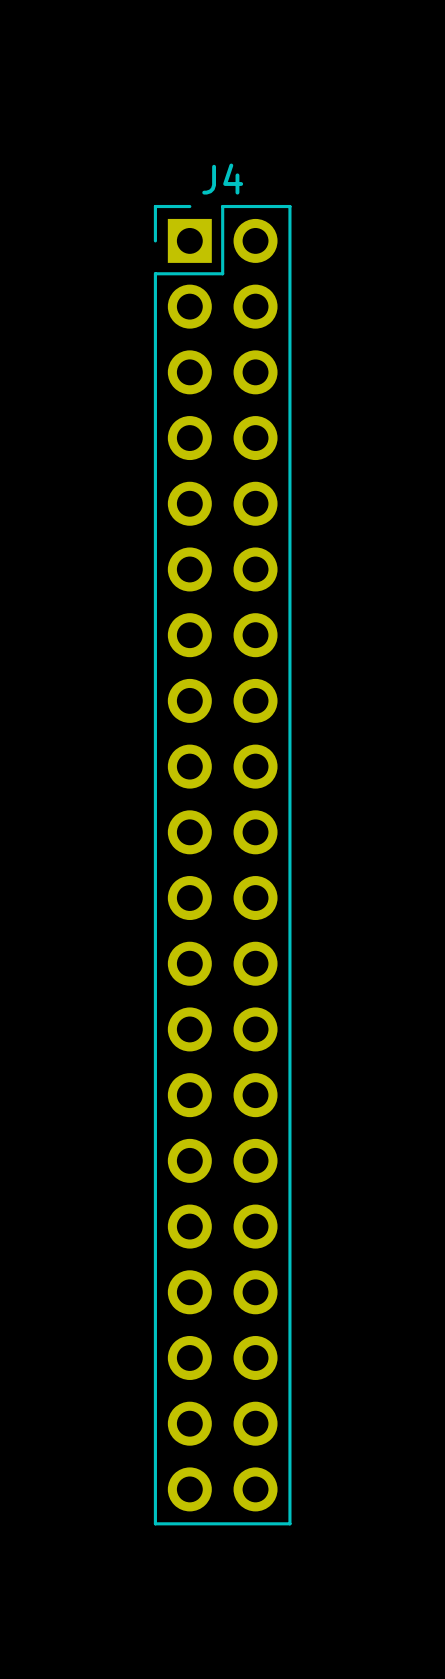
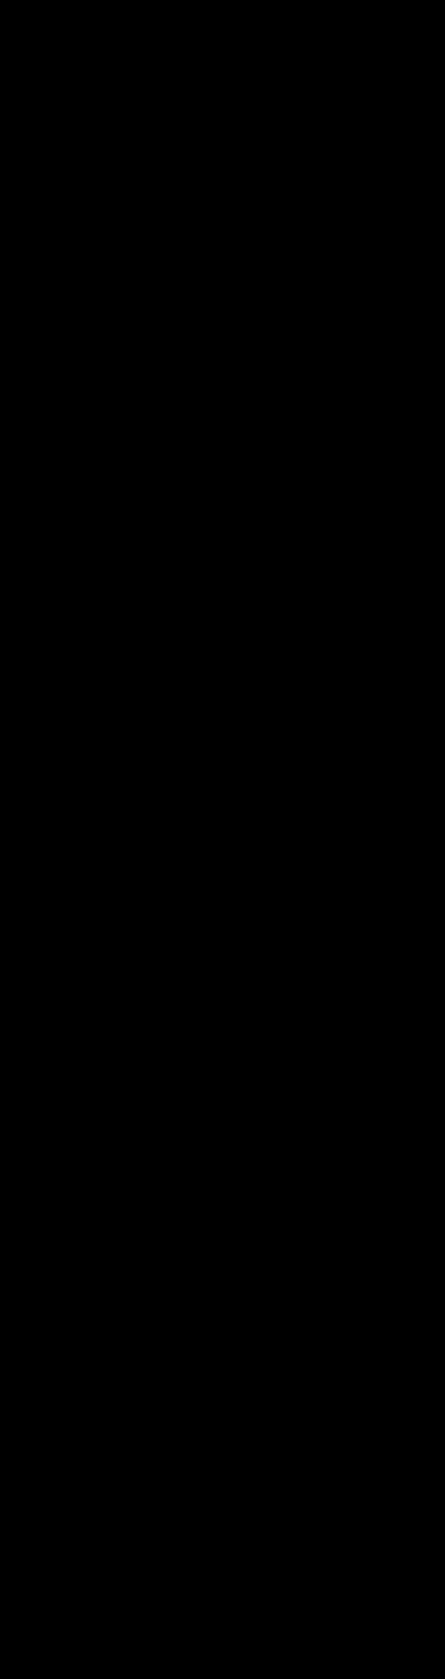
J4: (222, 865) -> none

